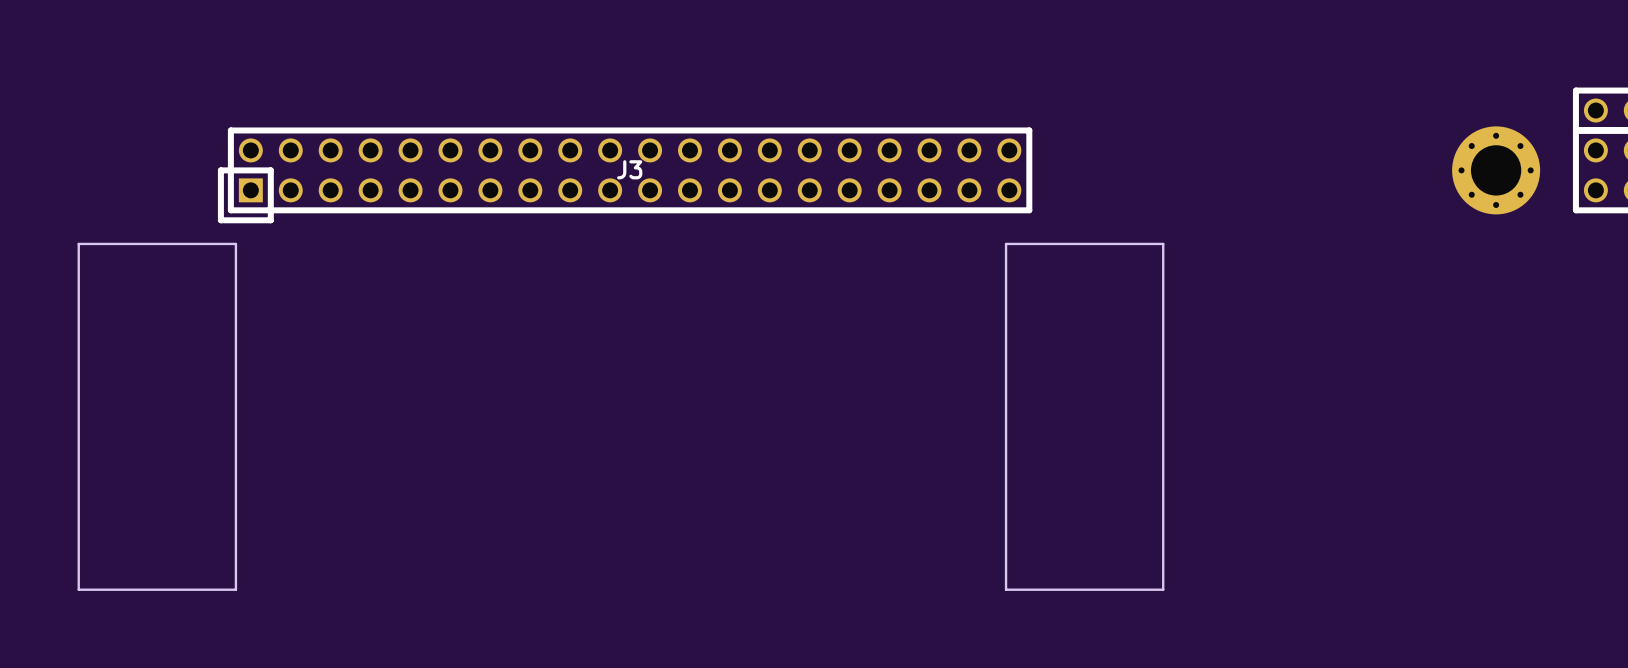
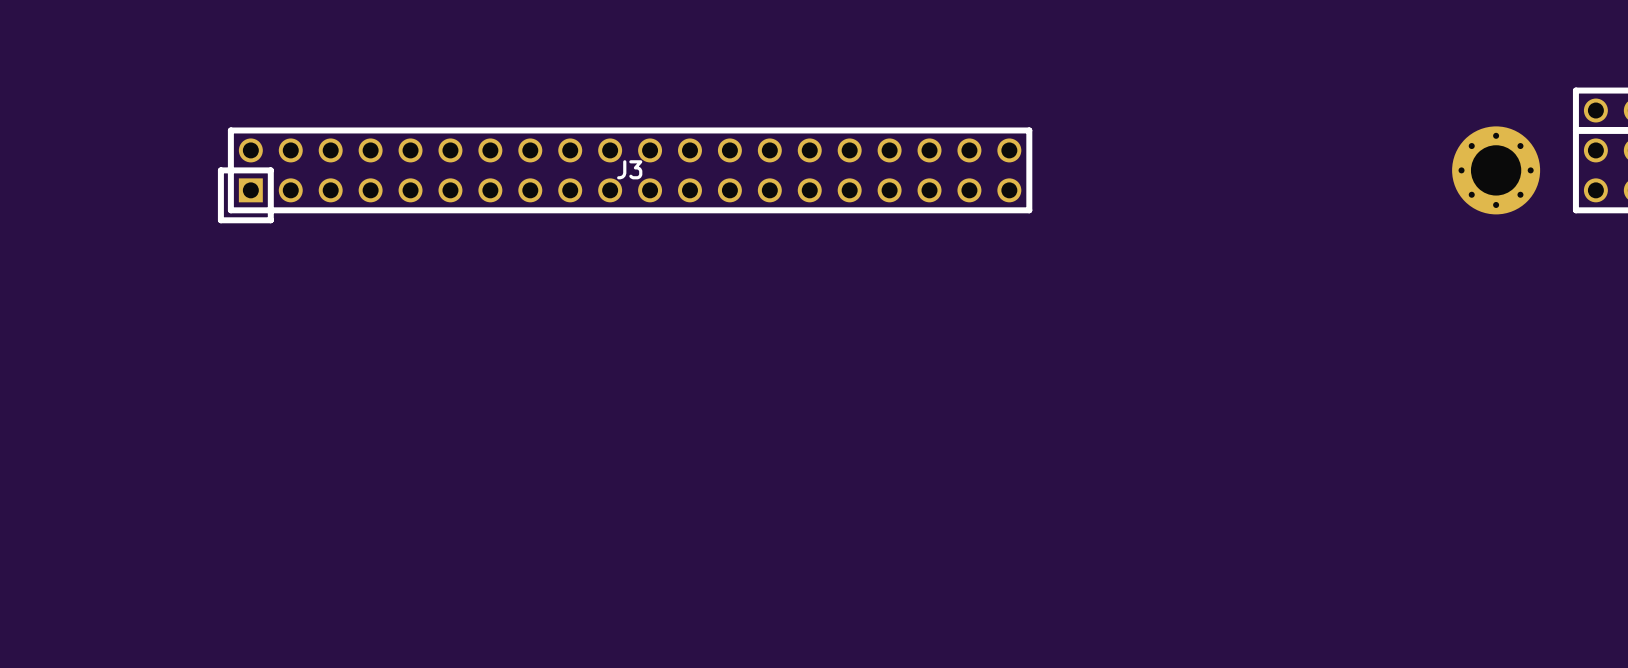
board edge: (235, 243) (78, 243) (78, 589) (235, 589) (235, 243) -> none
board edge: (1163, 243) (1006, 243) (1006, 589) (1163, 589) (1163, 243) -> none

